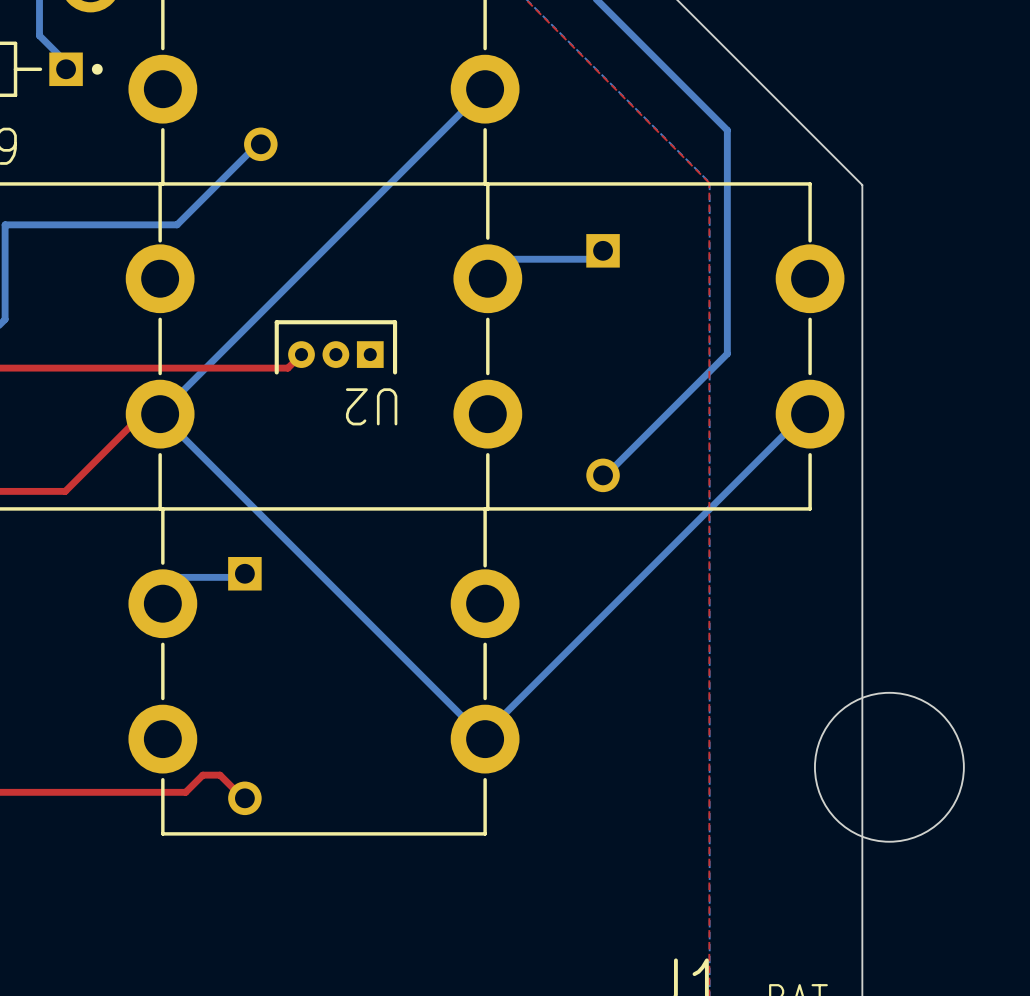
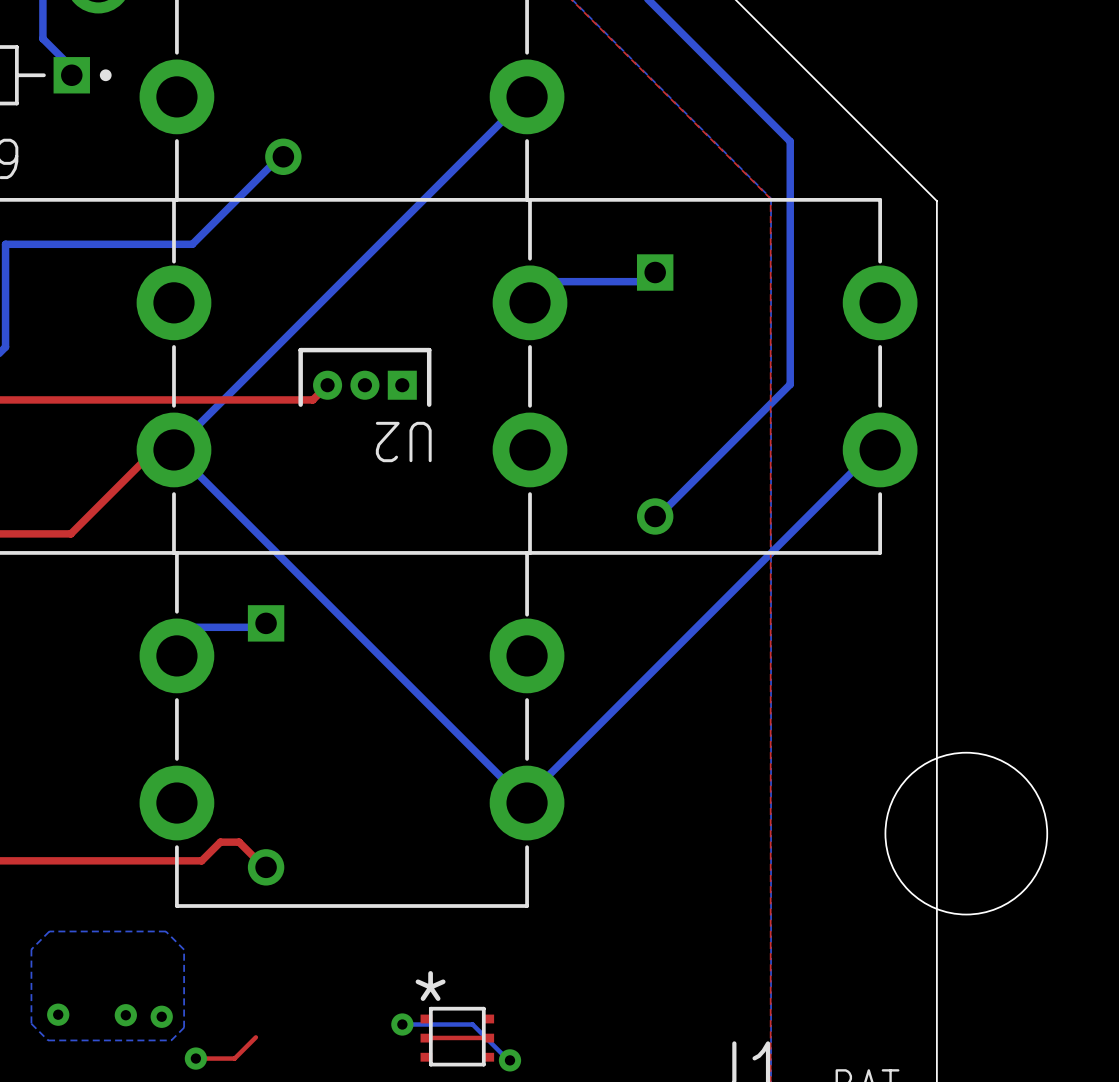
bottom zone outline: none -> (49, 931) (165, 931) (184, 949) (184, 1027) (171, 1040) (48, 1040) (31, 1023) (31, 949) (49, 931)
via: none -> (58, 1014)
via: none -> (125, 1015)
via: none -> (161, 1016)
bottom track: none -> (402, 1024) (472, 1024) (509, 1060)
via: none -> (402, 1024)
top track: none -> (255, 1037) (234, 1058) (195, 1058)
part: none -> (457, 1036)
top track: none -> (426, 1038) (488, 1038)
via: none -> (195, 1058)
via: none -> (509, 1060)

